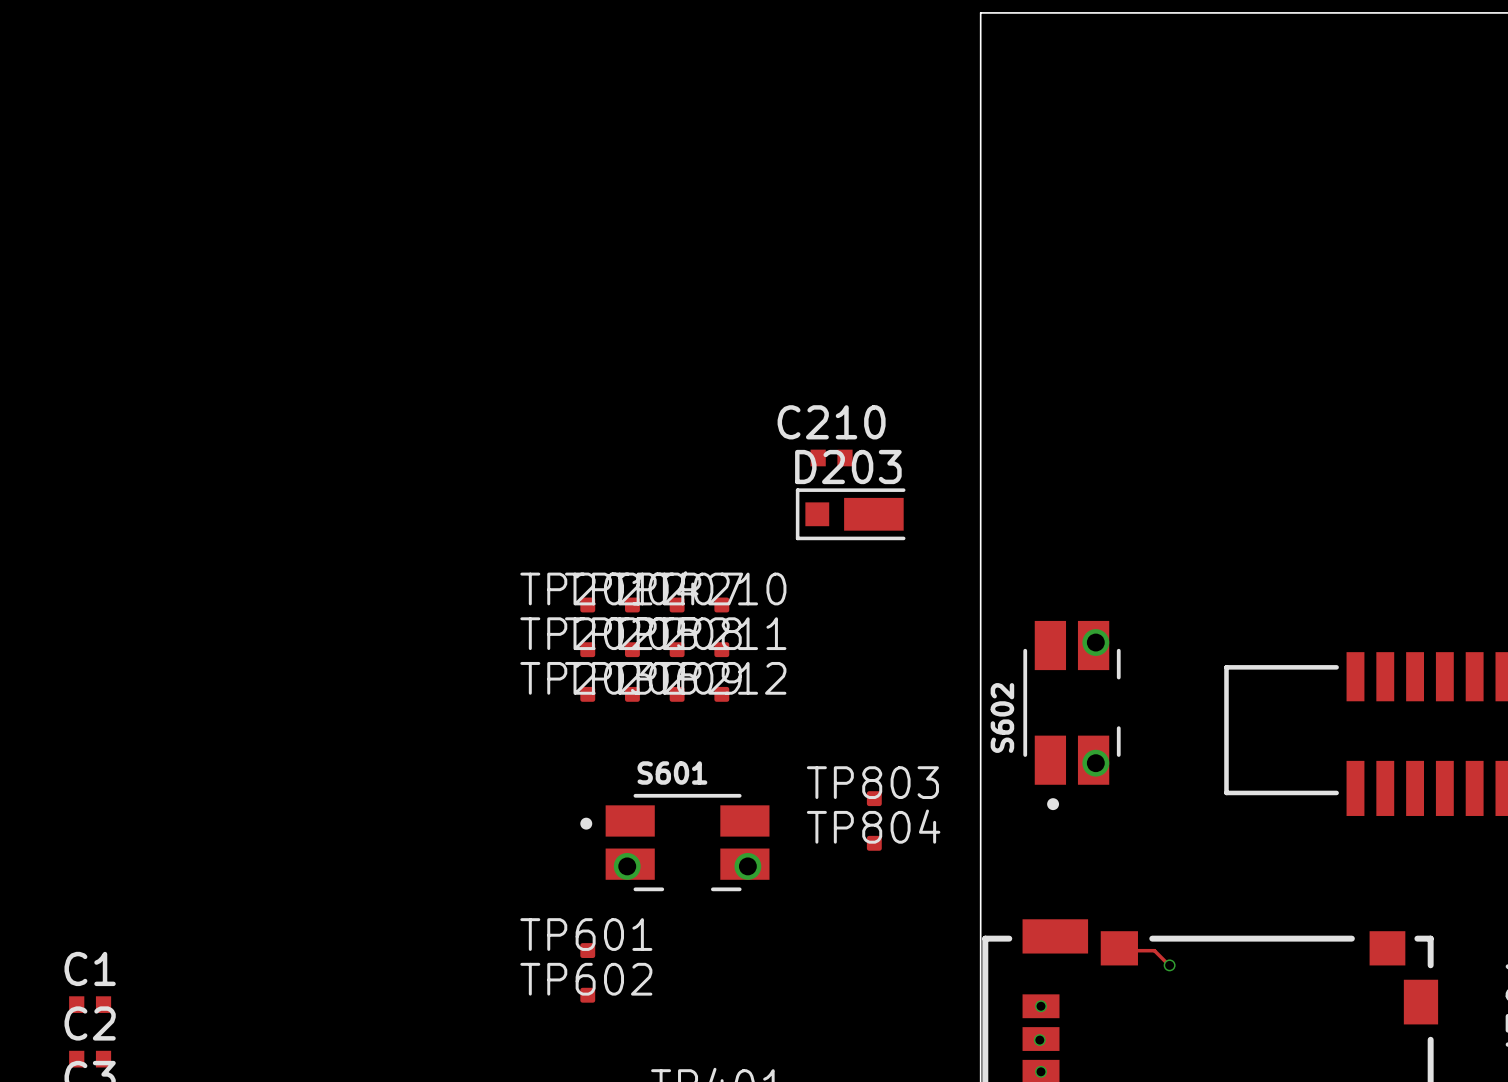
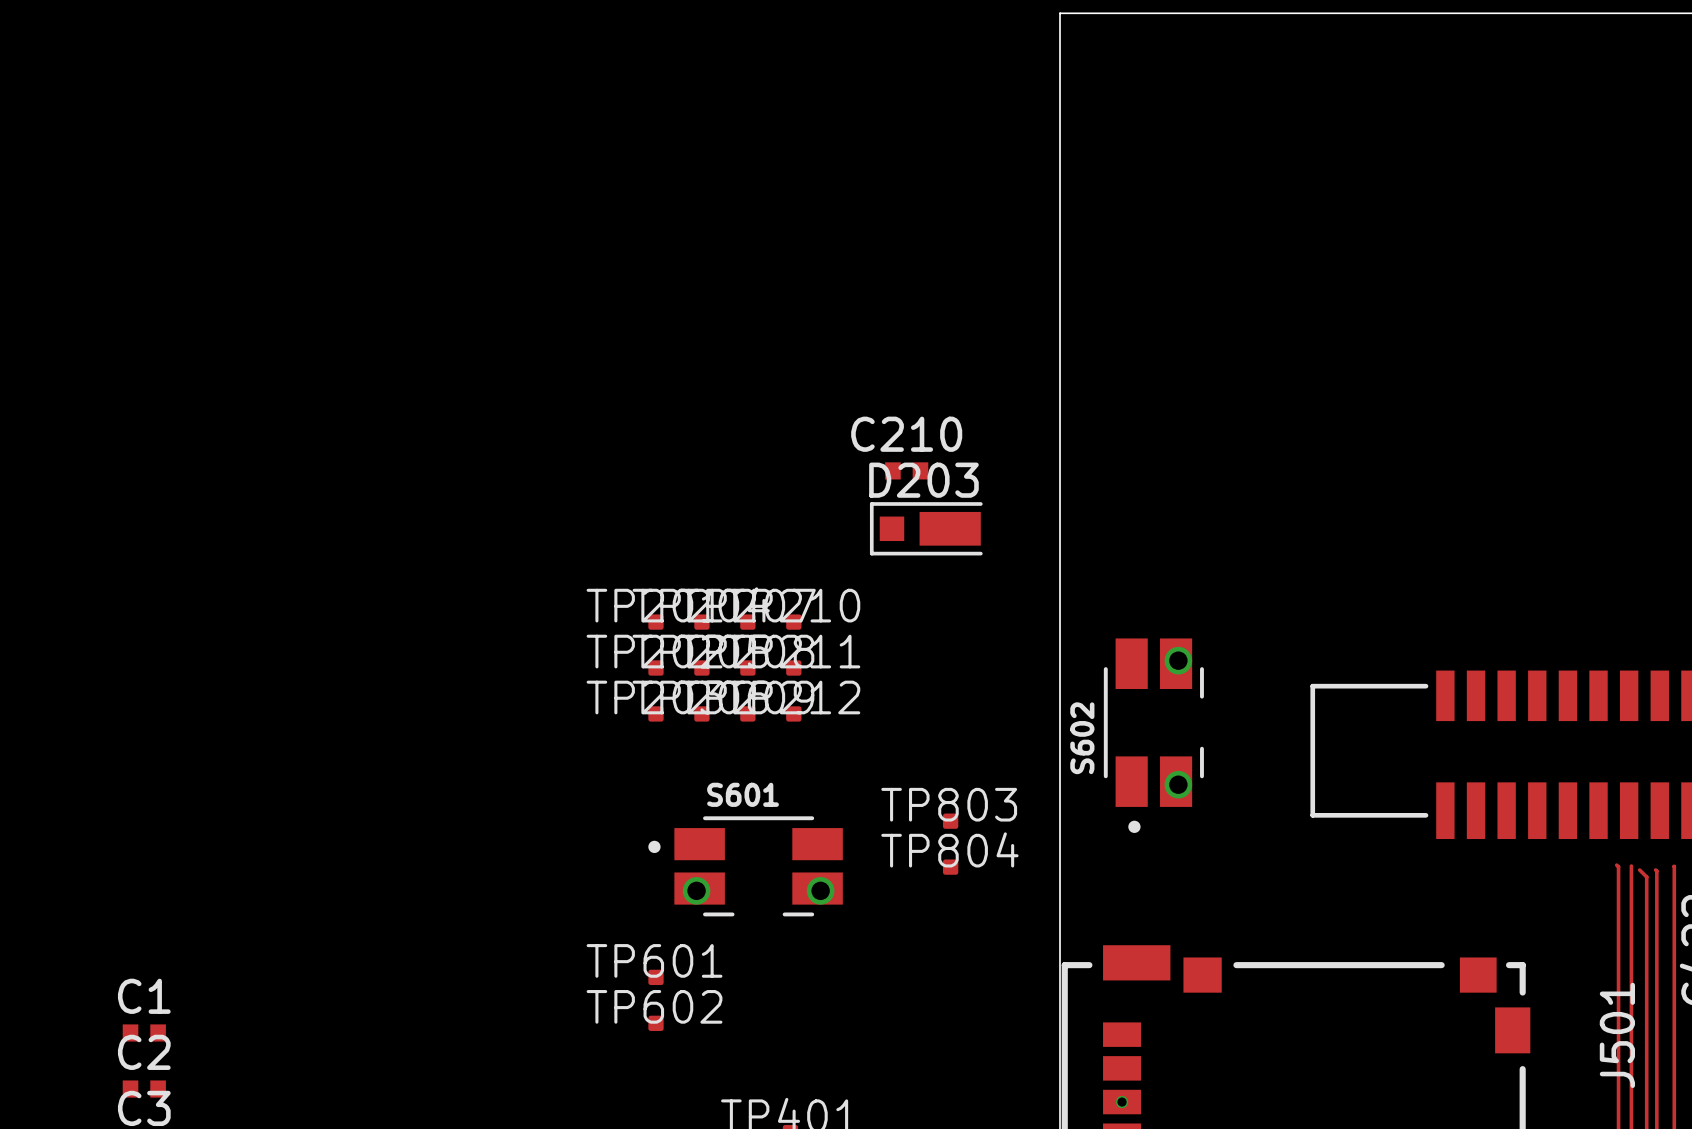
track: (1119, 948) (1121, 950) (1154, 950) (1169, 965) -> none
via: (1169, 965) -> none
via: (1041, 1006) -> none
via: (1039, 1040) -> none

